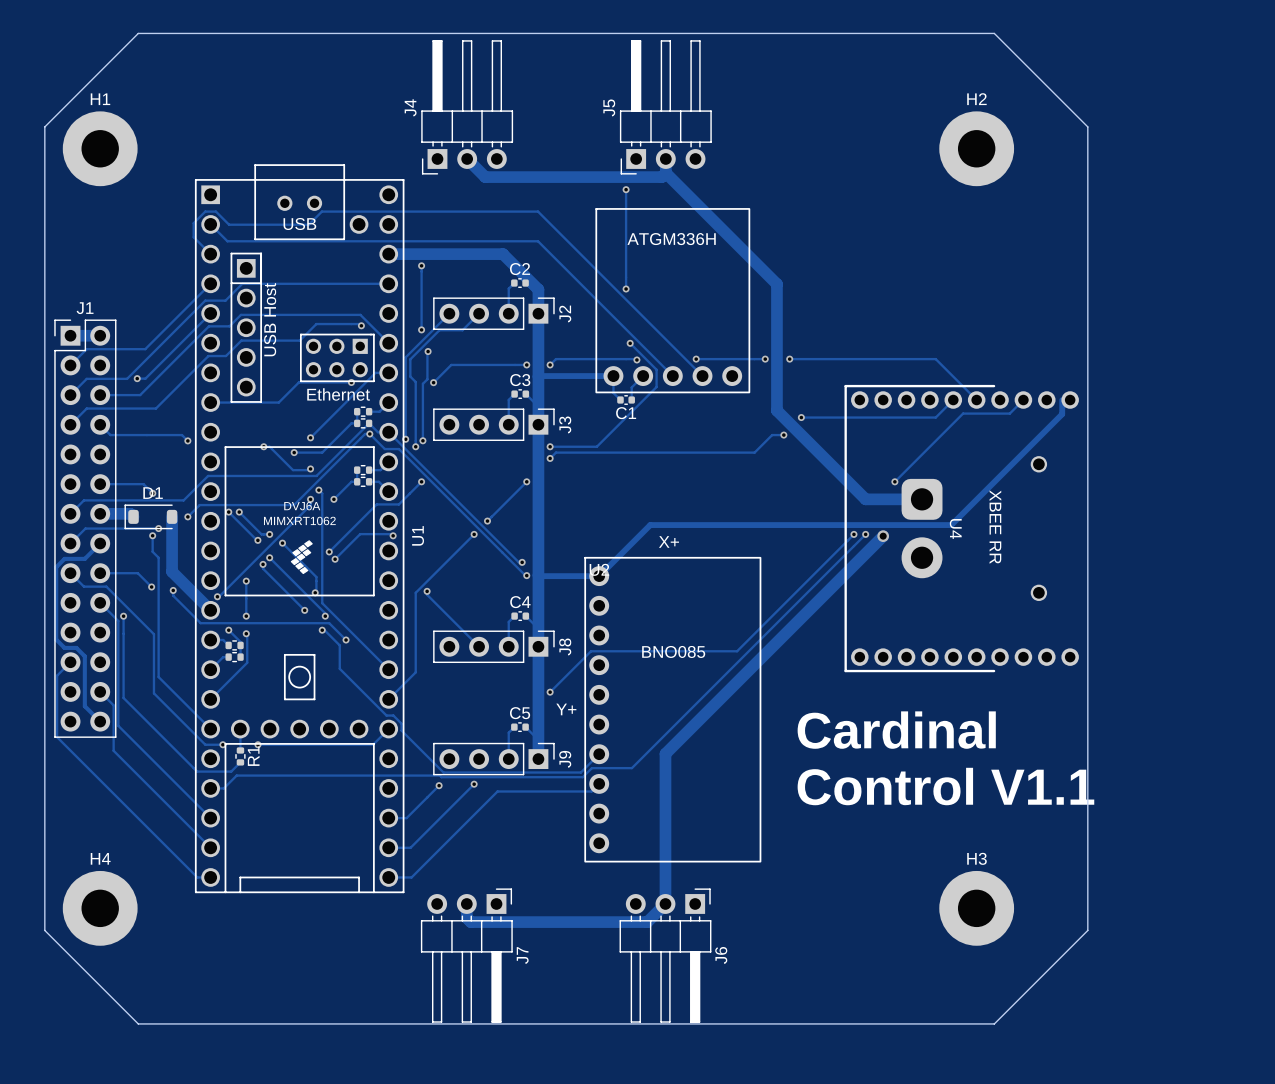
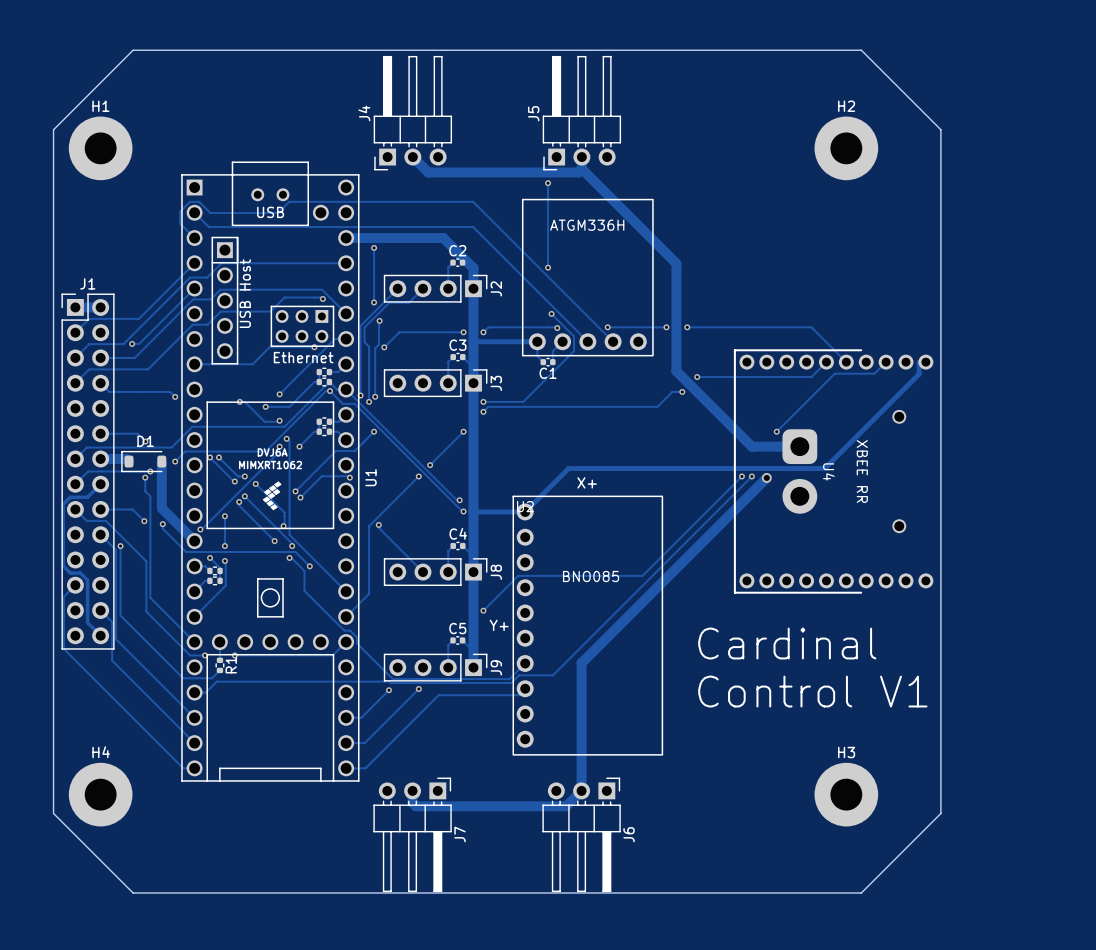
text: Control V1.1 (945, 786) -> Control V1 (812, 691)

